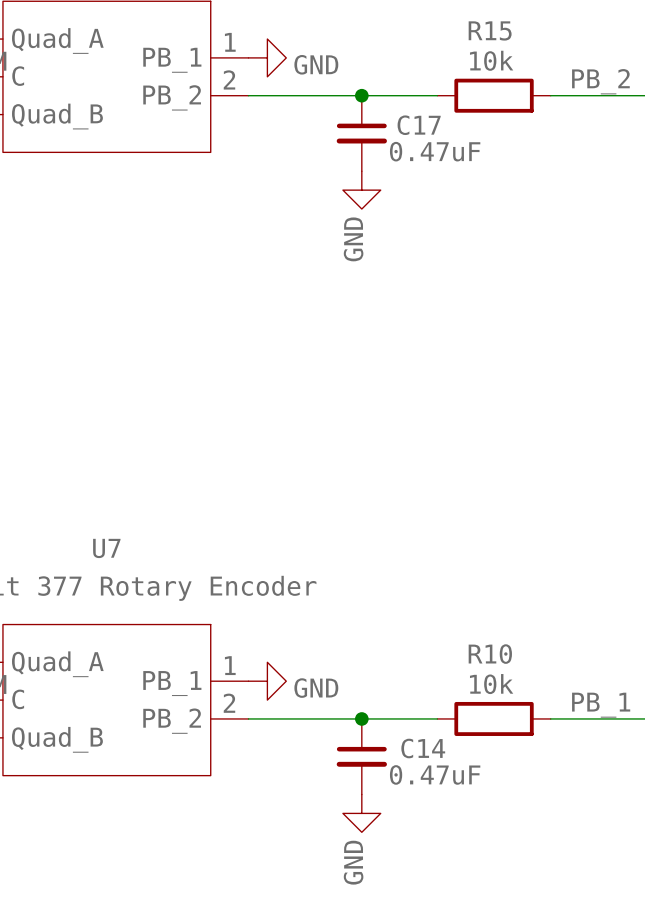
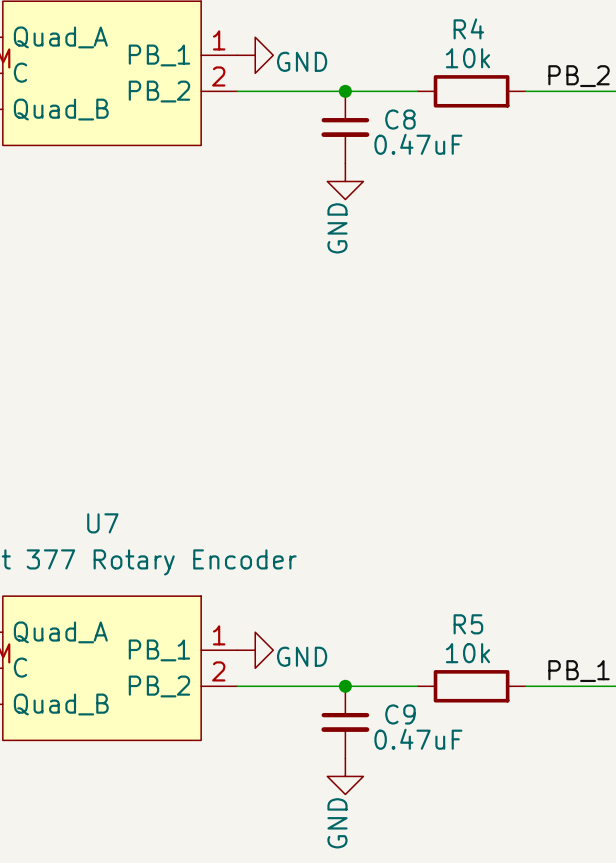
R15 name: R15 (490, 30) -> R4 (468, 28)
C17 name: C17 (419, 125) -> C8 (400, 119)
R10 name: R10 (490, 654) -> R5 (468, 624)
C14 name: C14 (423, 748) -> C9 (400, 714)

